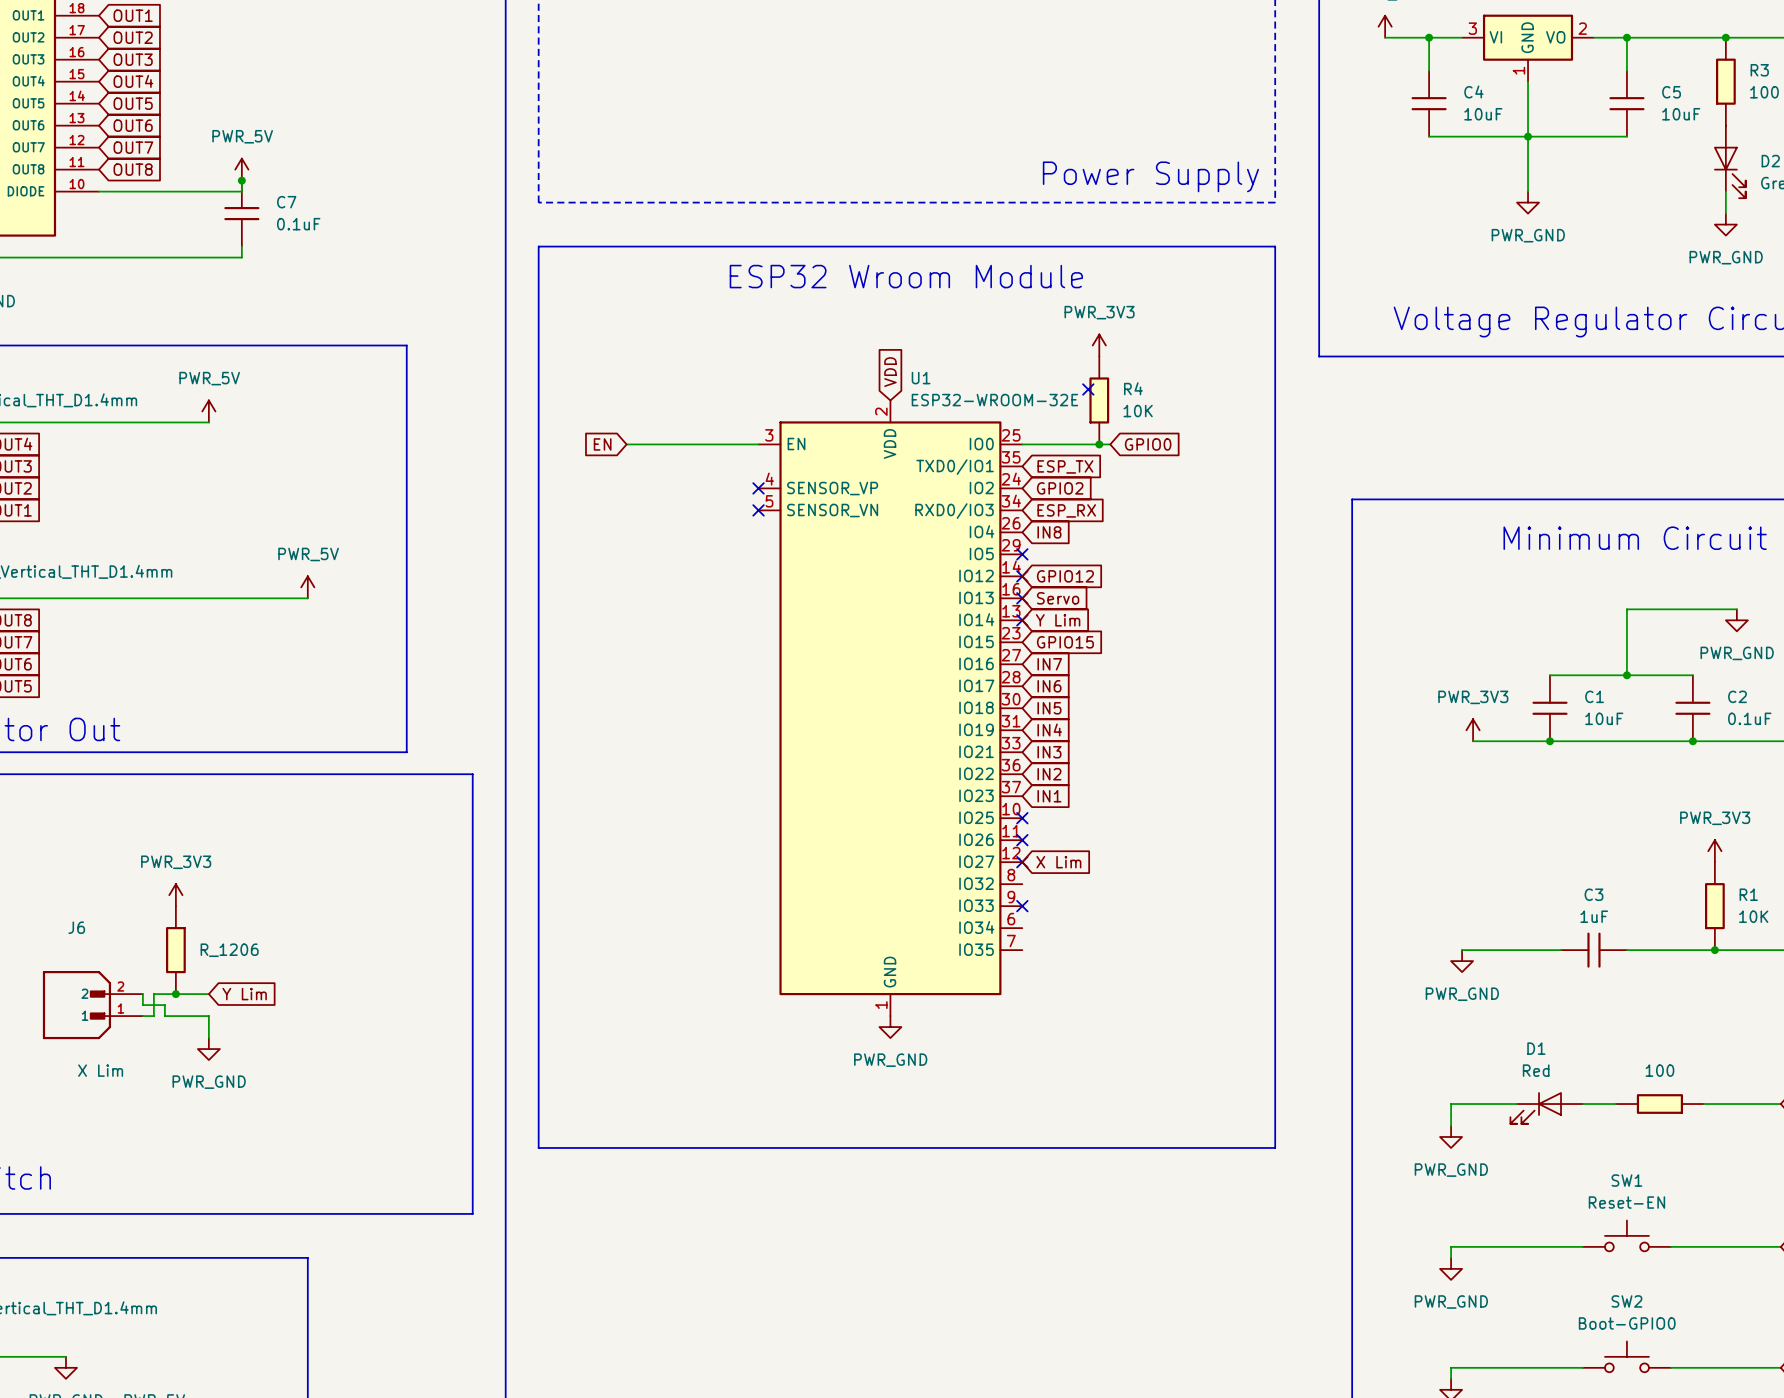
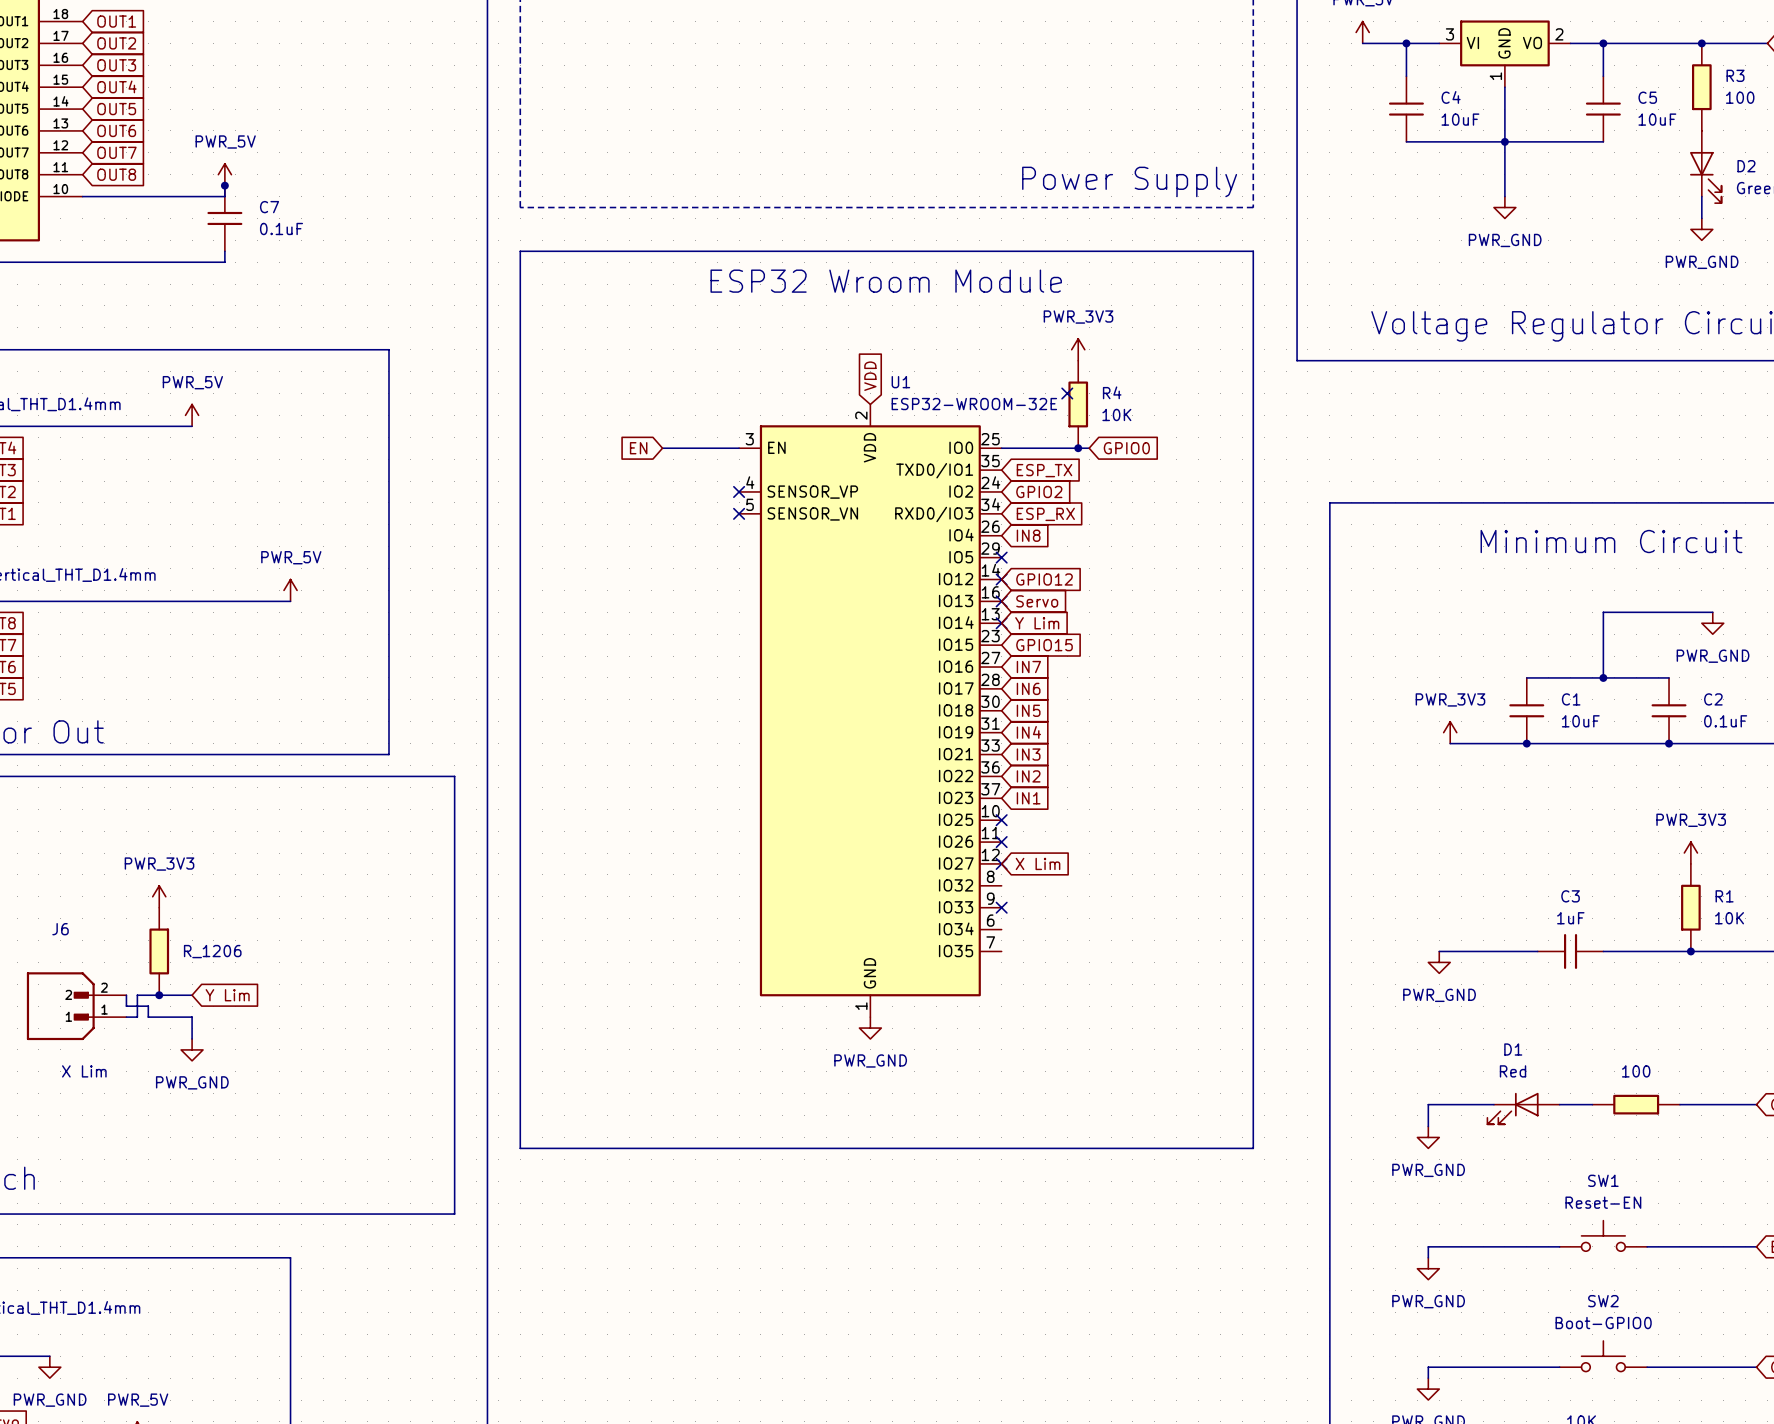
global label position: EN (602, 444) -> EN (638, 448)
wire: (626, 444) (681, 444) -> none

